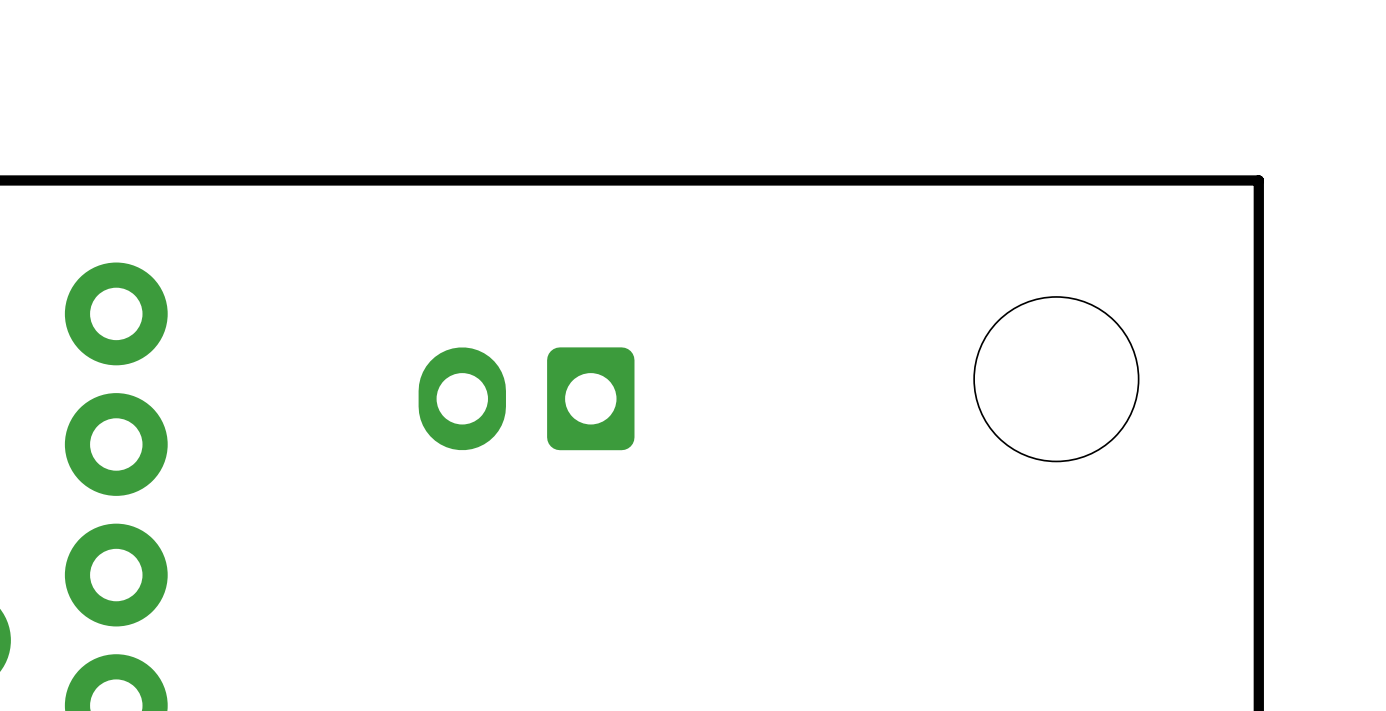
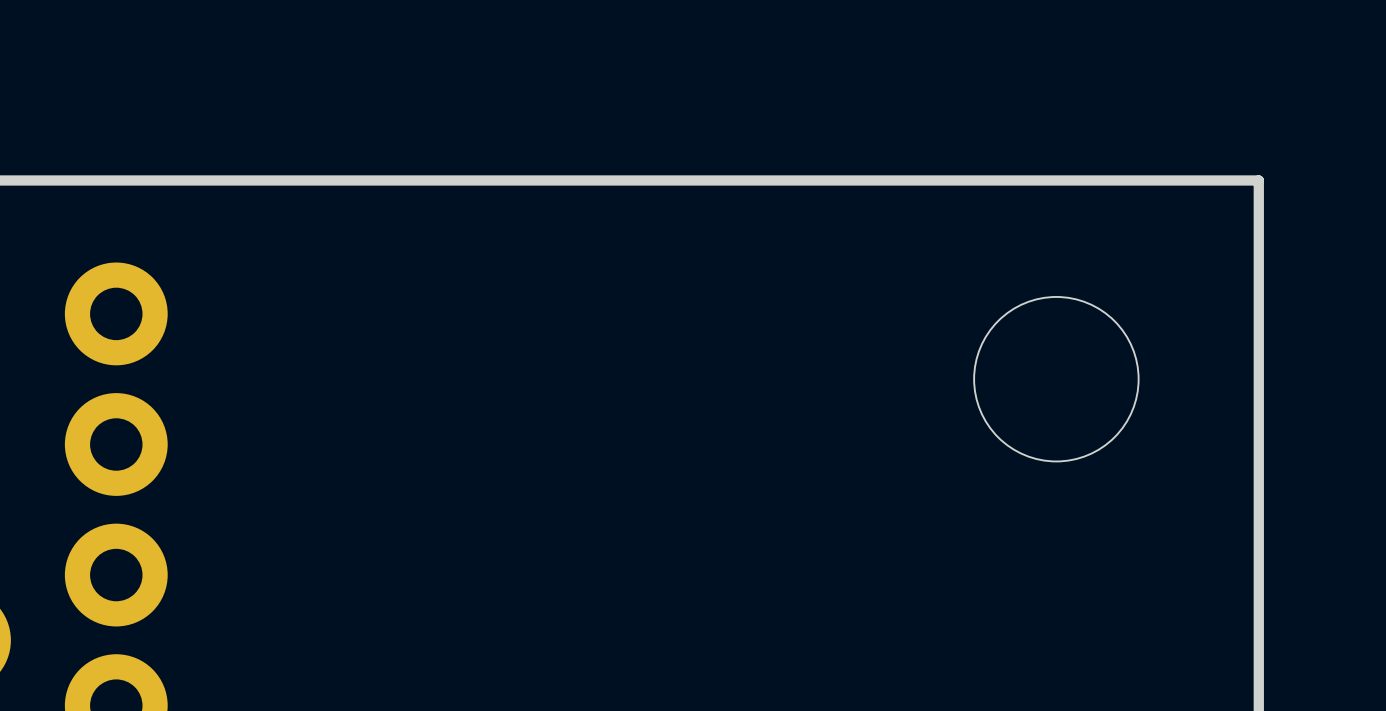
part: (526, 398) -> none

